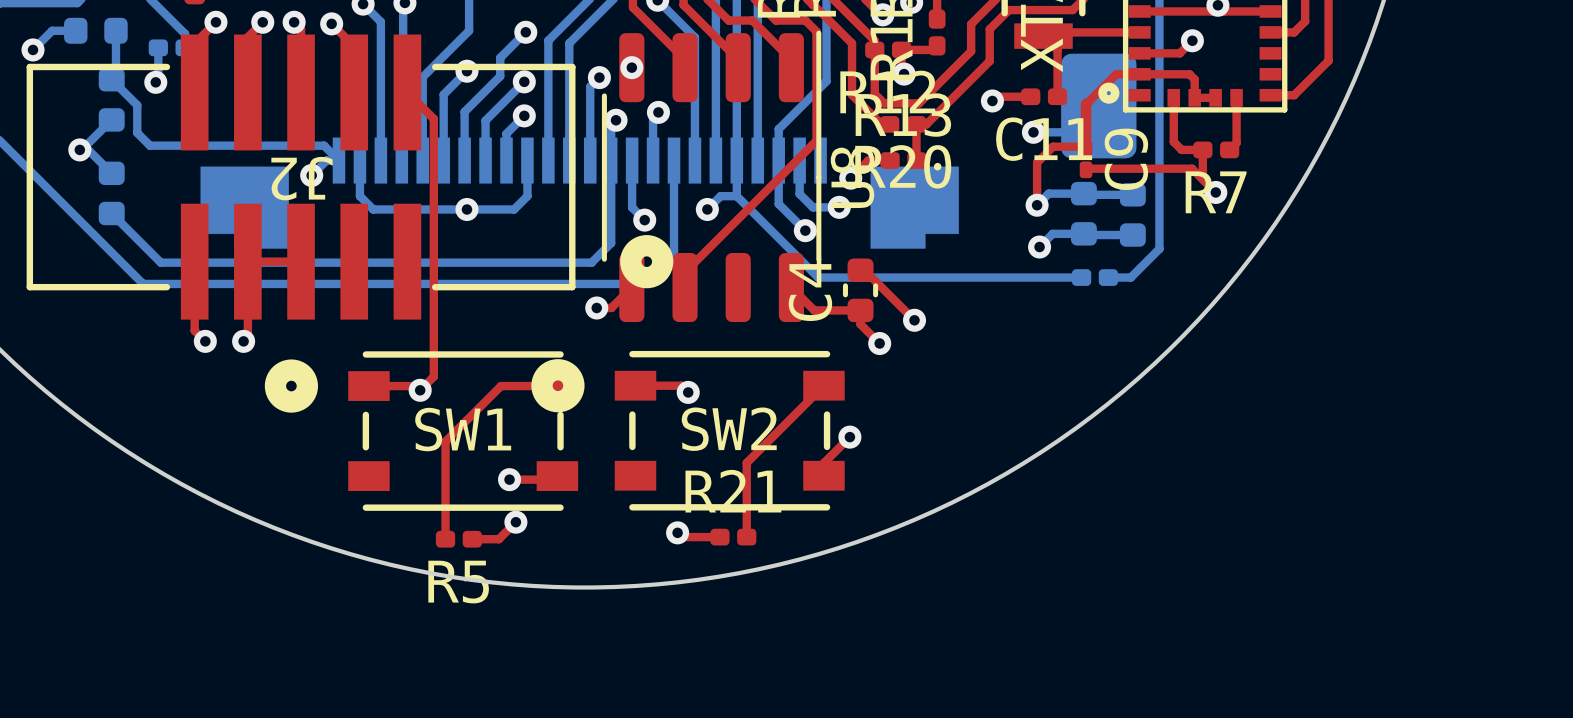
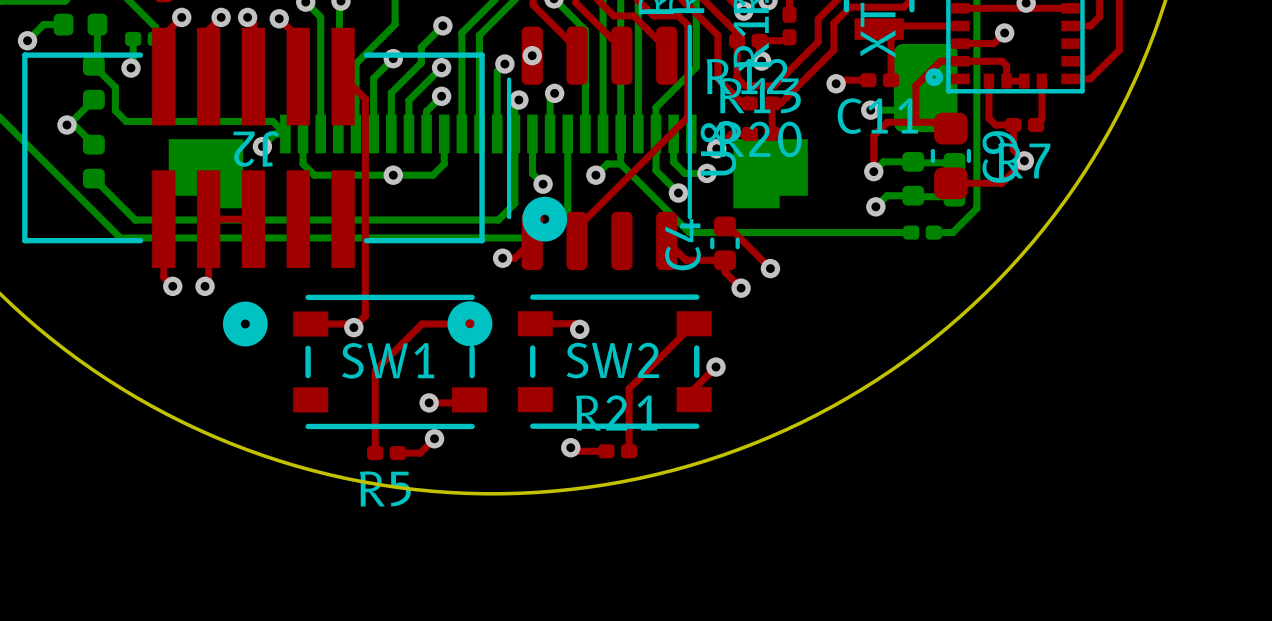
top track: (1087, 103) (1086, 148) (1083, 146) -> (915, 85) (915, 119) (913, 122) (944, 122) (950, 128)
C9 footprint: [1079, 140, 1093, 179] -> [930, 112, 971, 200]
top track: (1086, 169) (1192, 168) (1202, 179) -> none
top track: none -> (1024, 160) (1001, 183) (950, 183)

